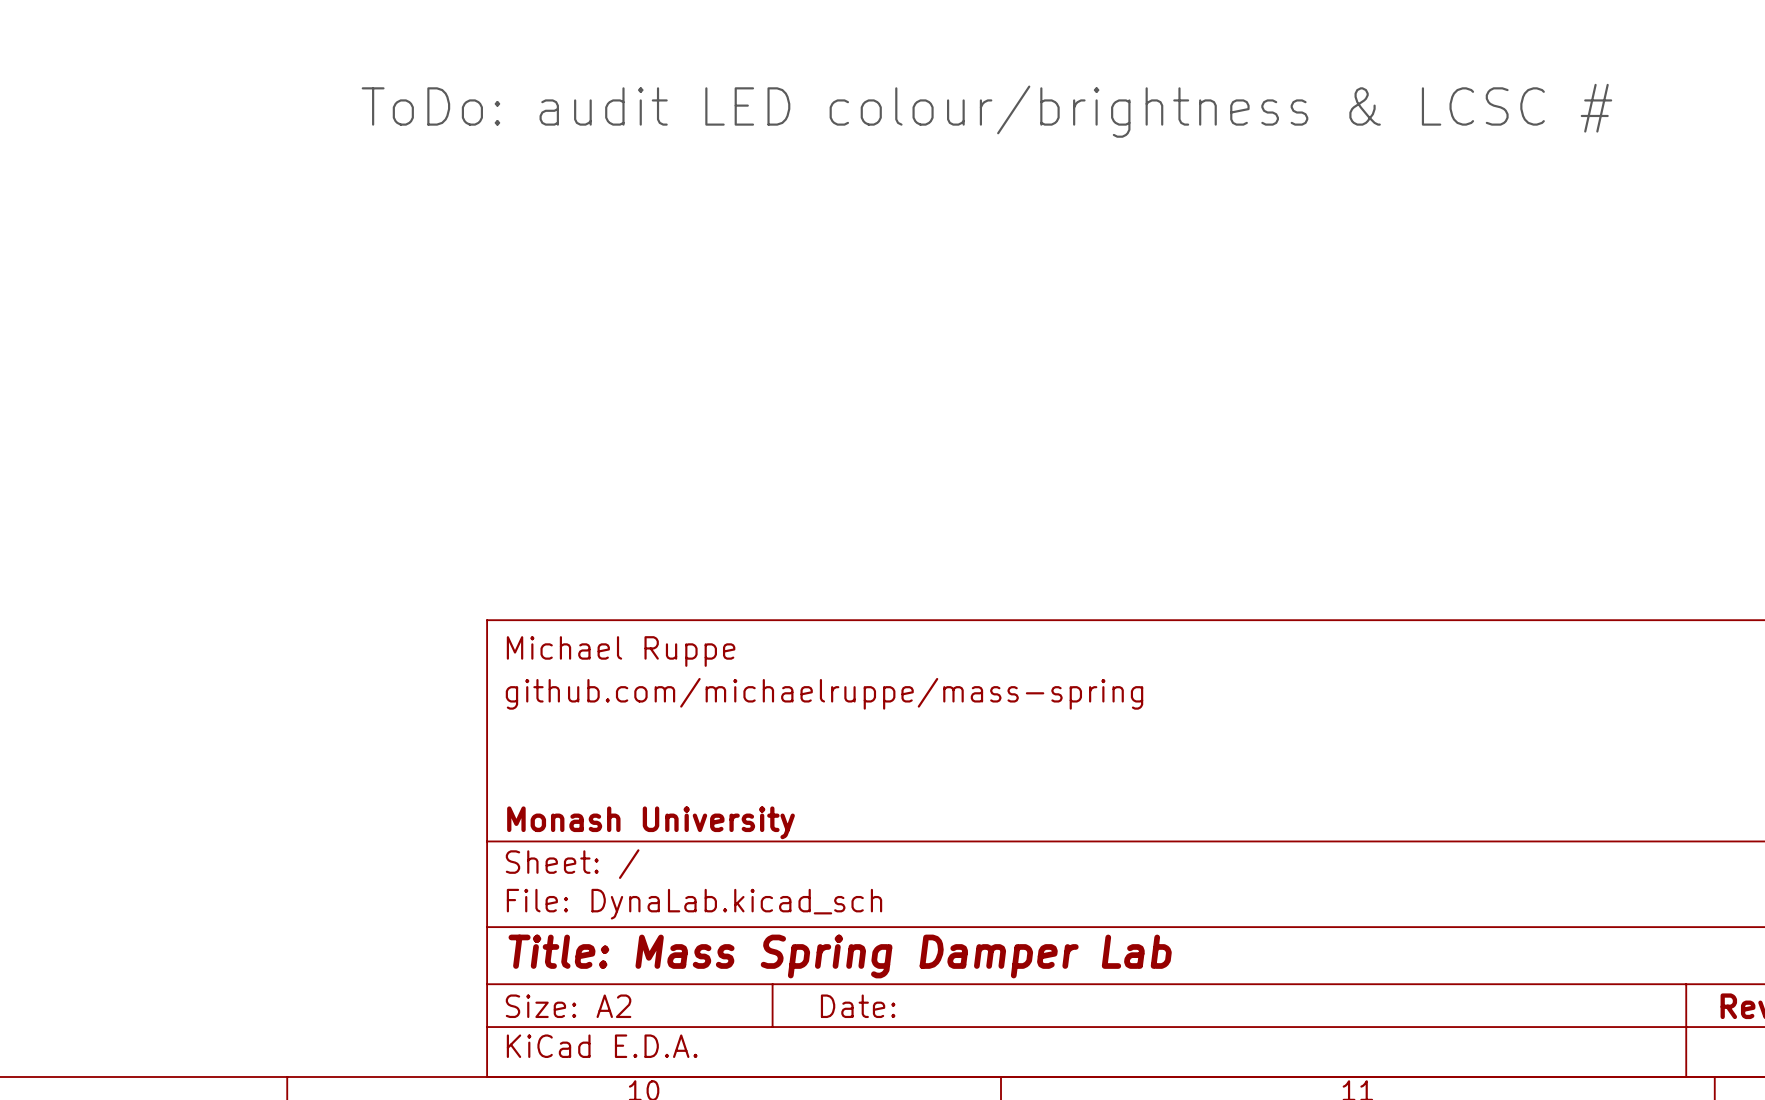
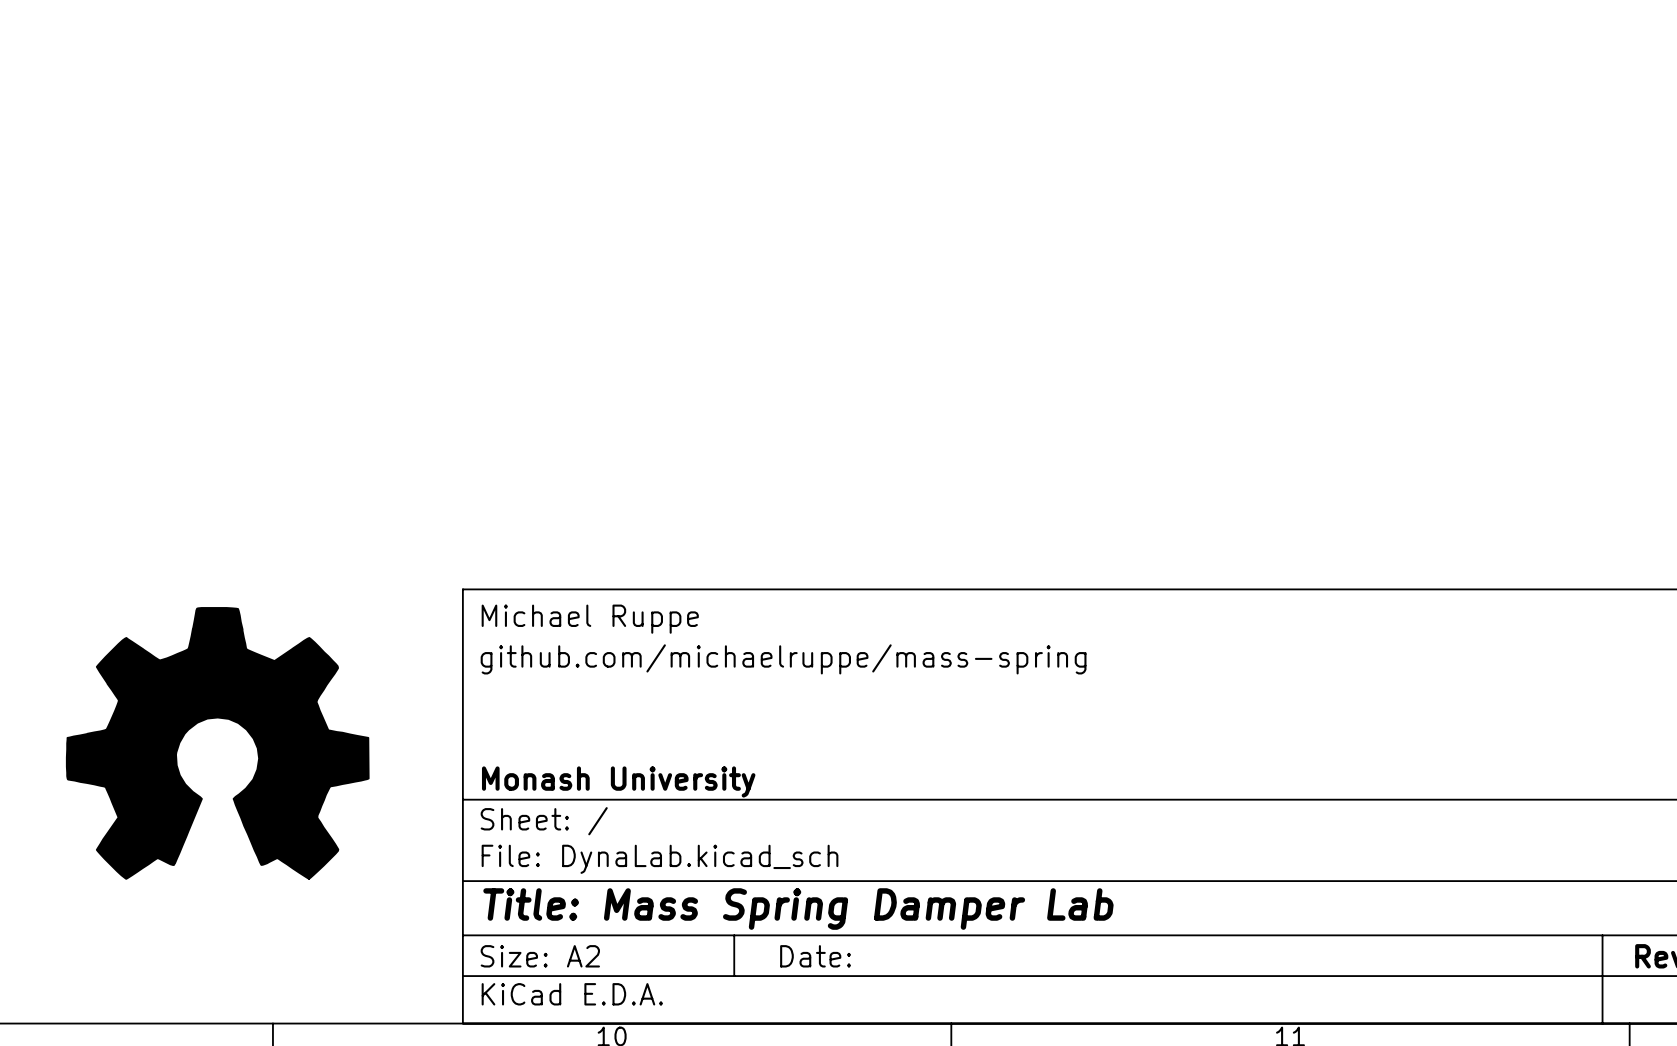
text: ToDo: audit LED colour/brightness & LCSC # (986, 110) -> none
power symbol: none -> (217, 743)

